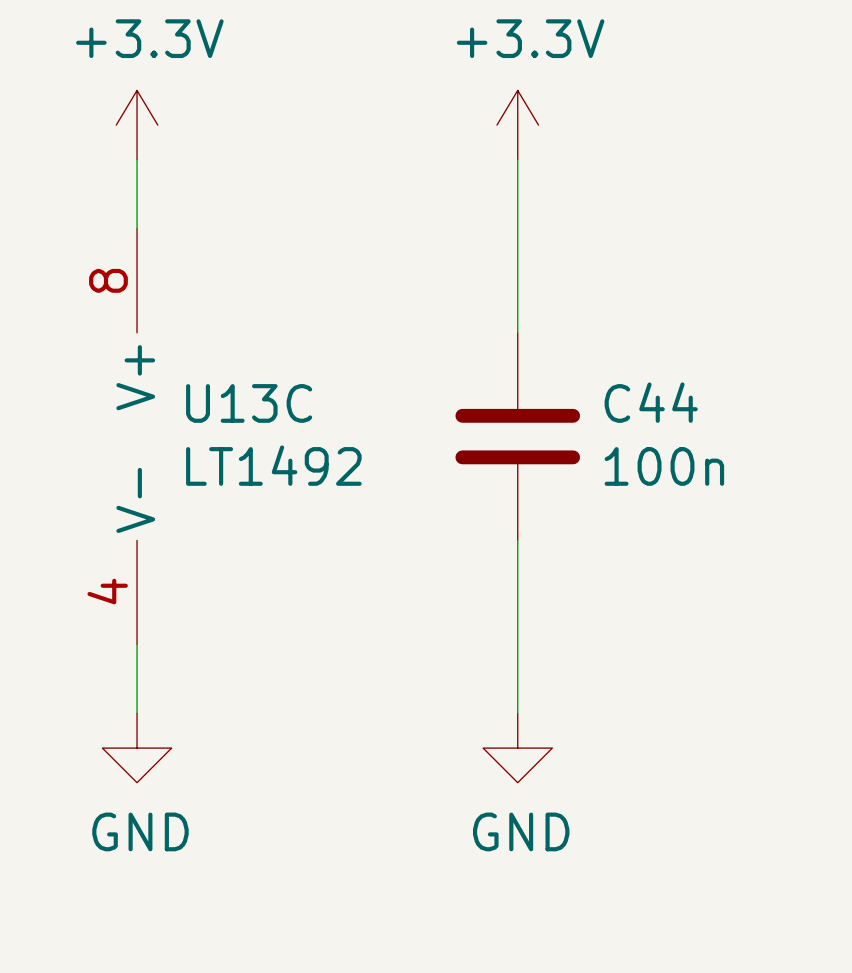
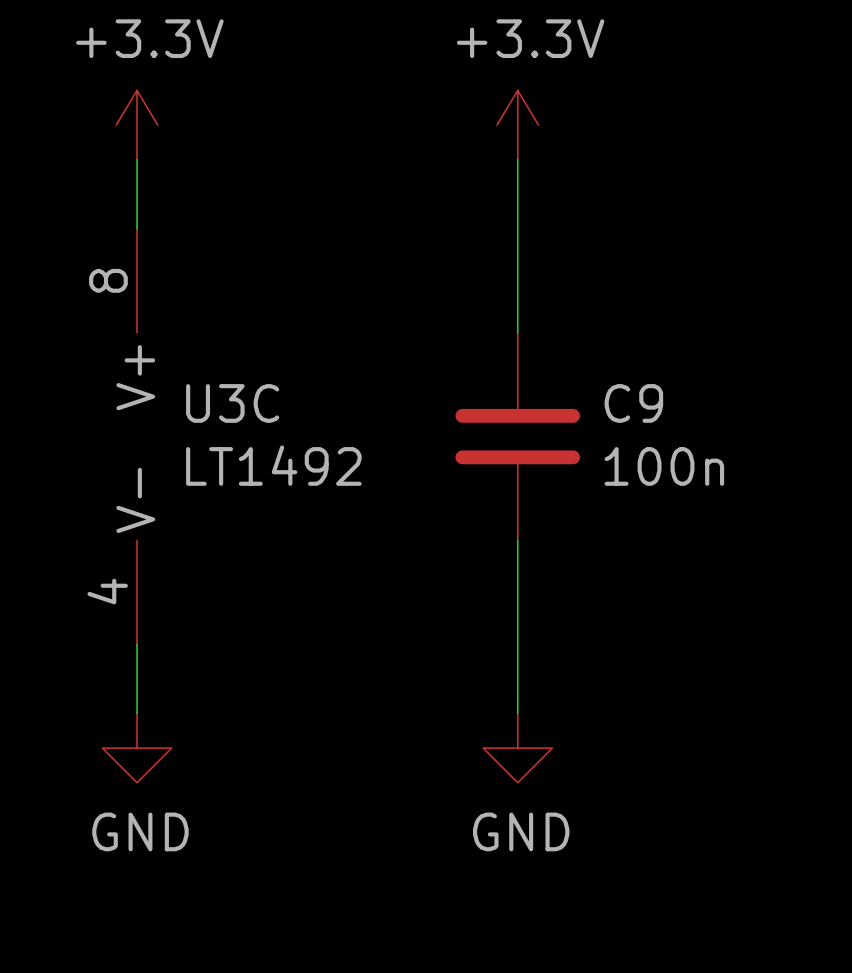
C44 name: C44 (651, 402) -> C9 (633, 403)
U13C name: U13C (249, 403) -> U3C (232, 403)

